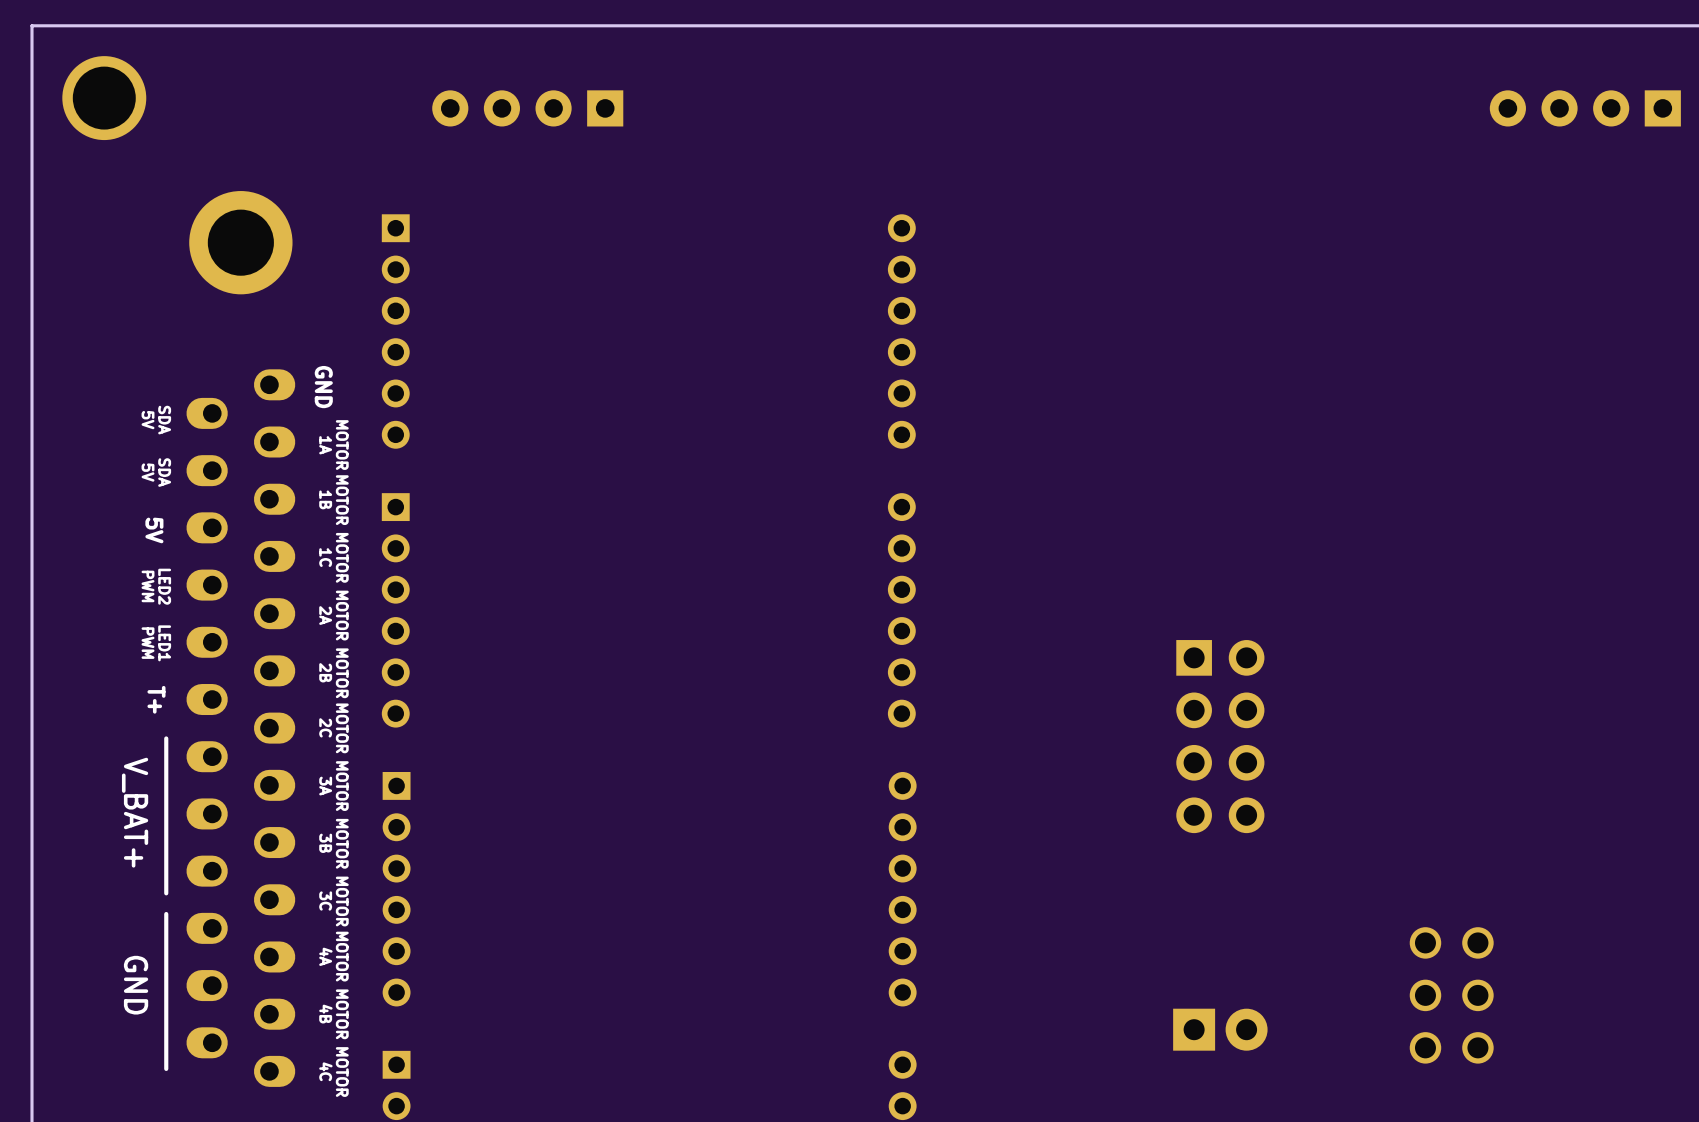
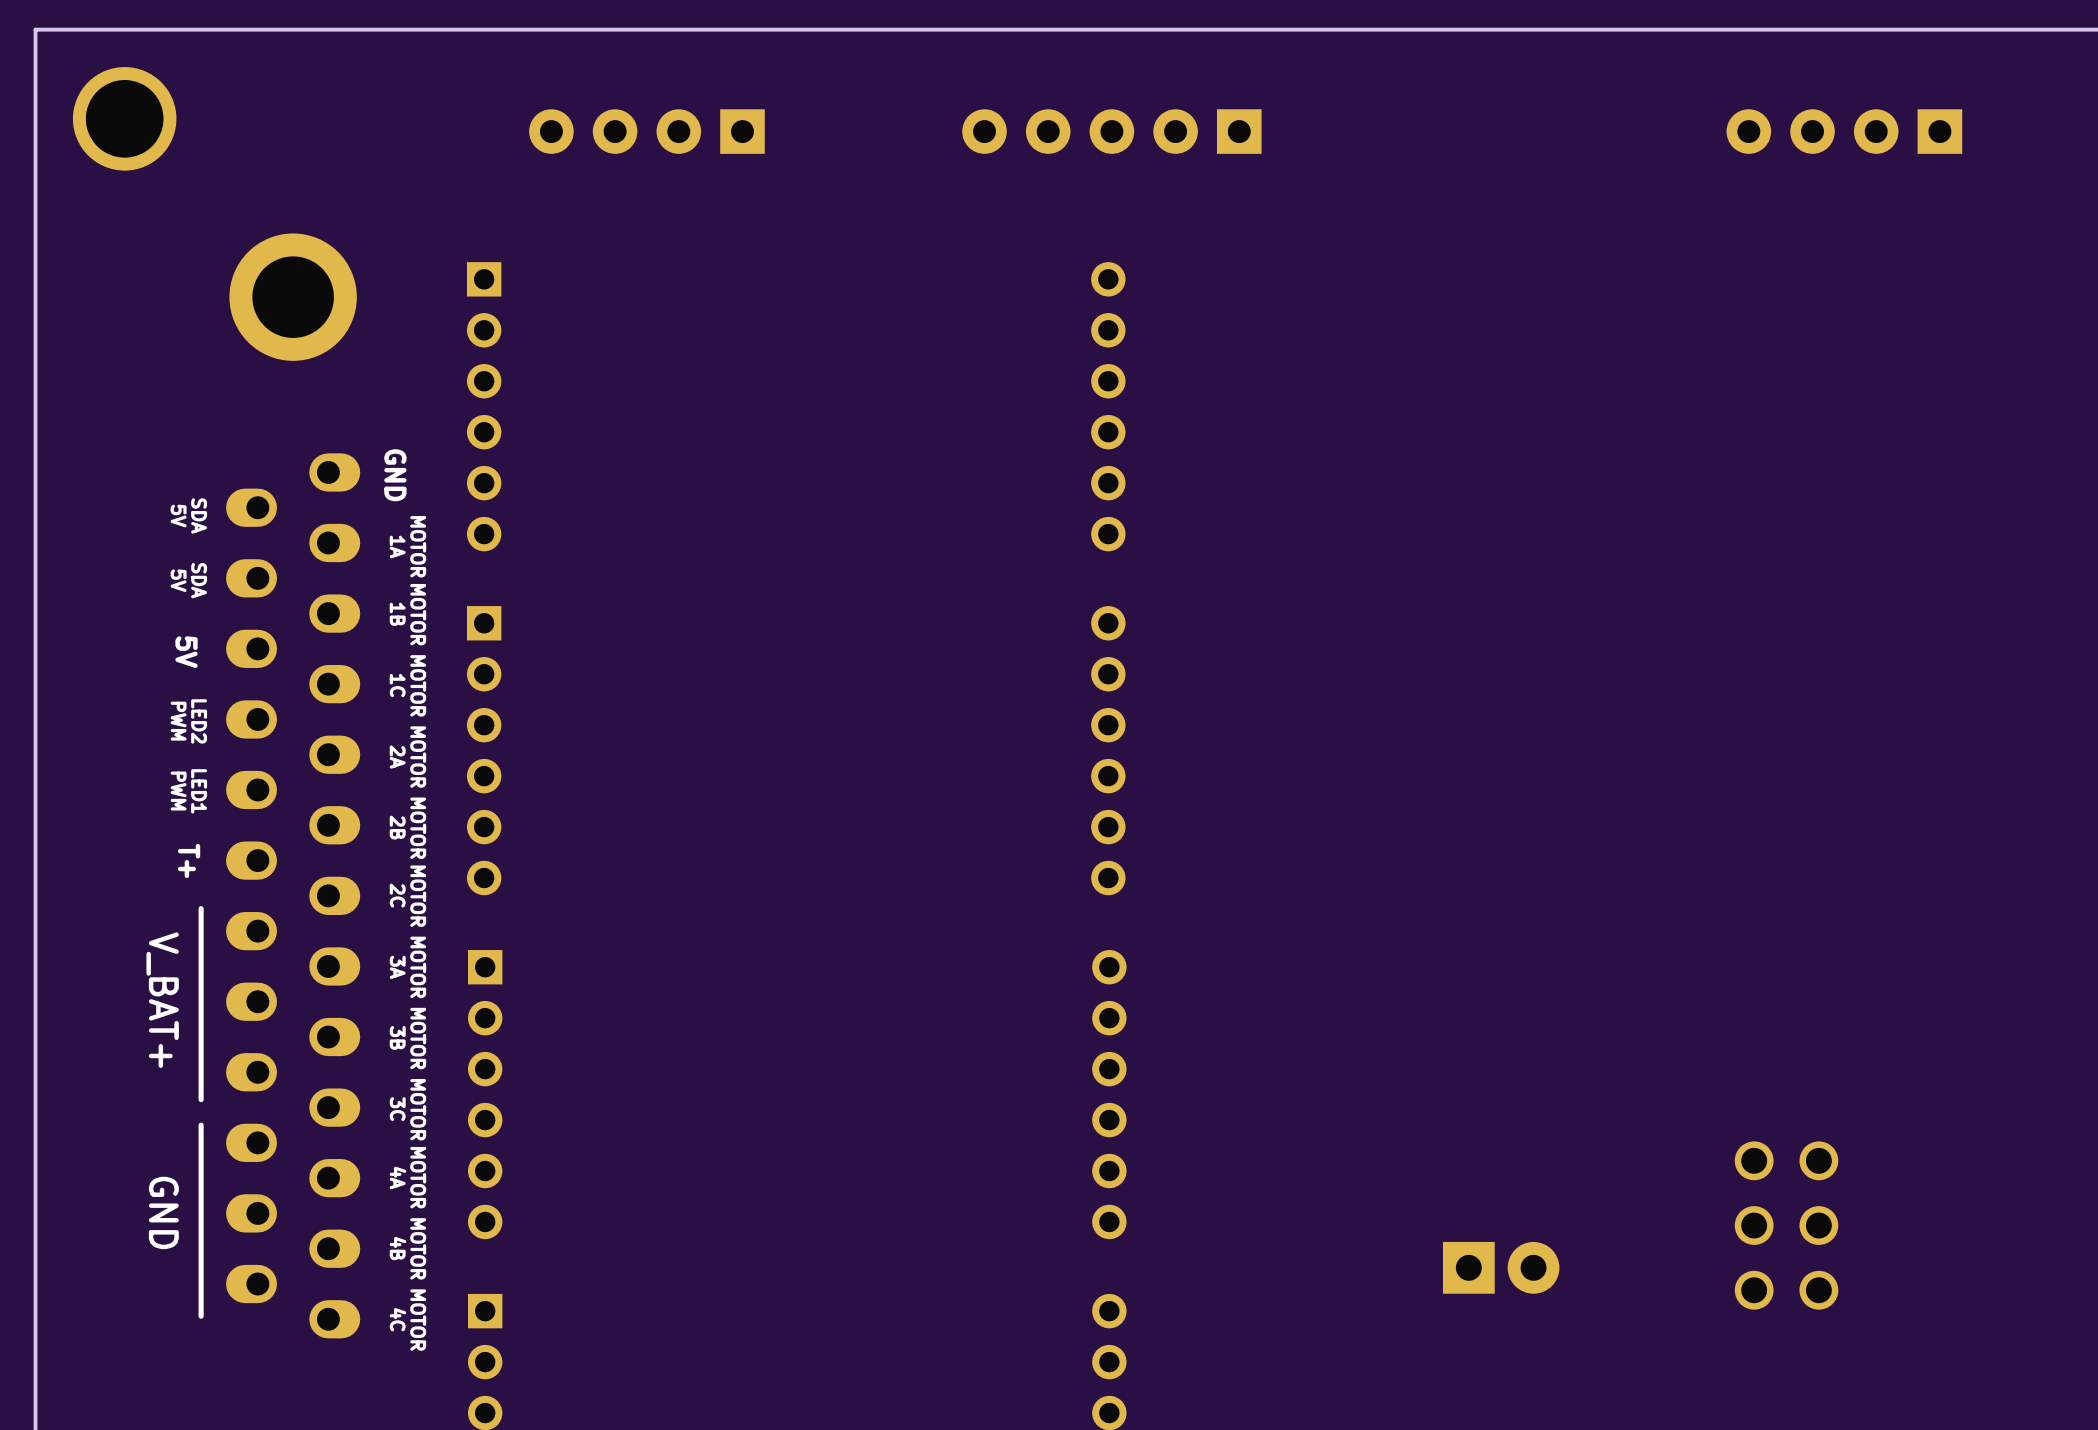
part: none -> (1111, 131)
part position: (1585, 108) -> (1844, 131)
part: (1220, 736) -> none

